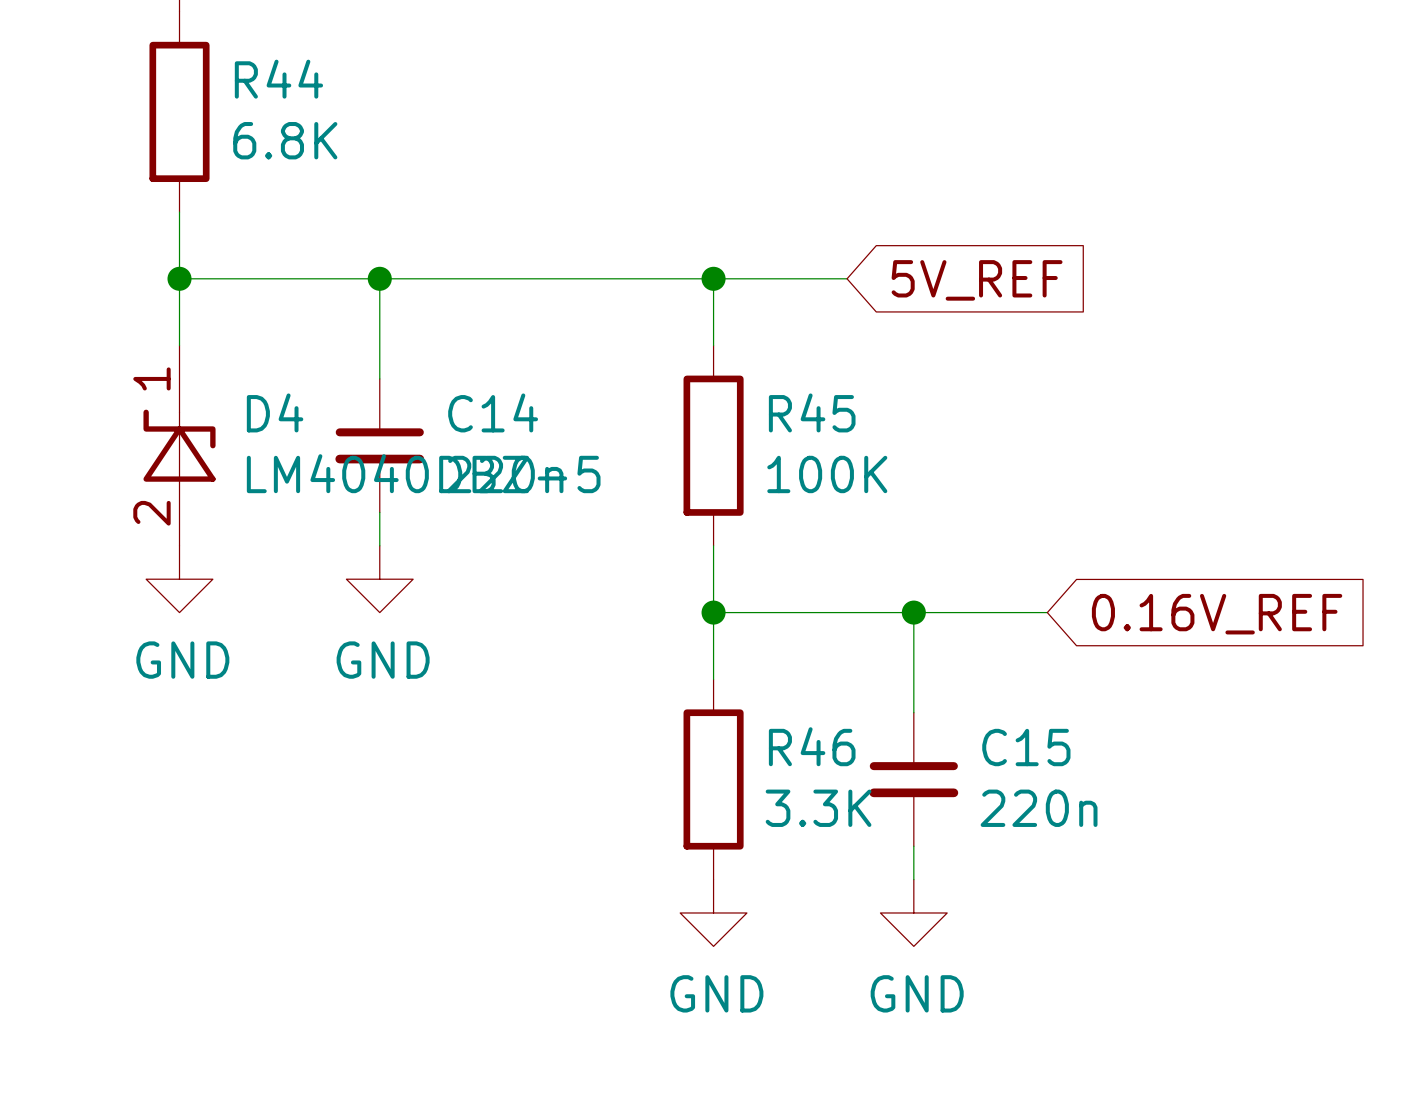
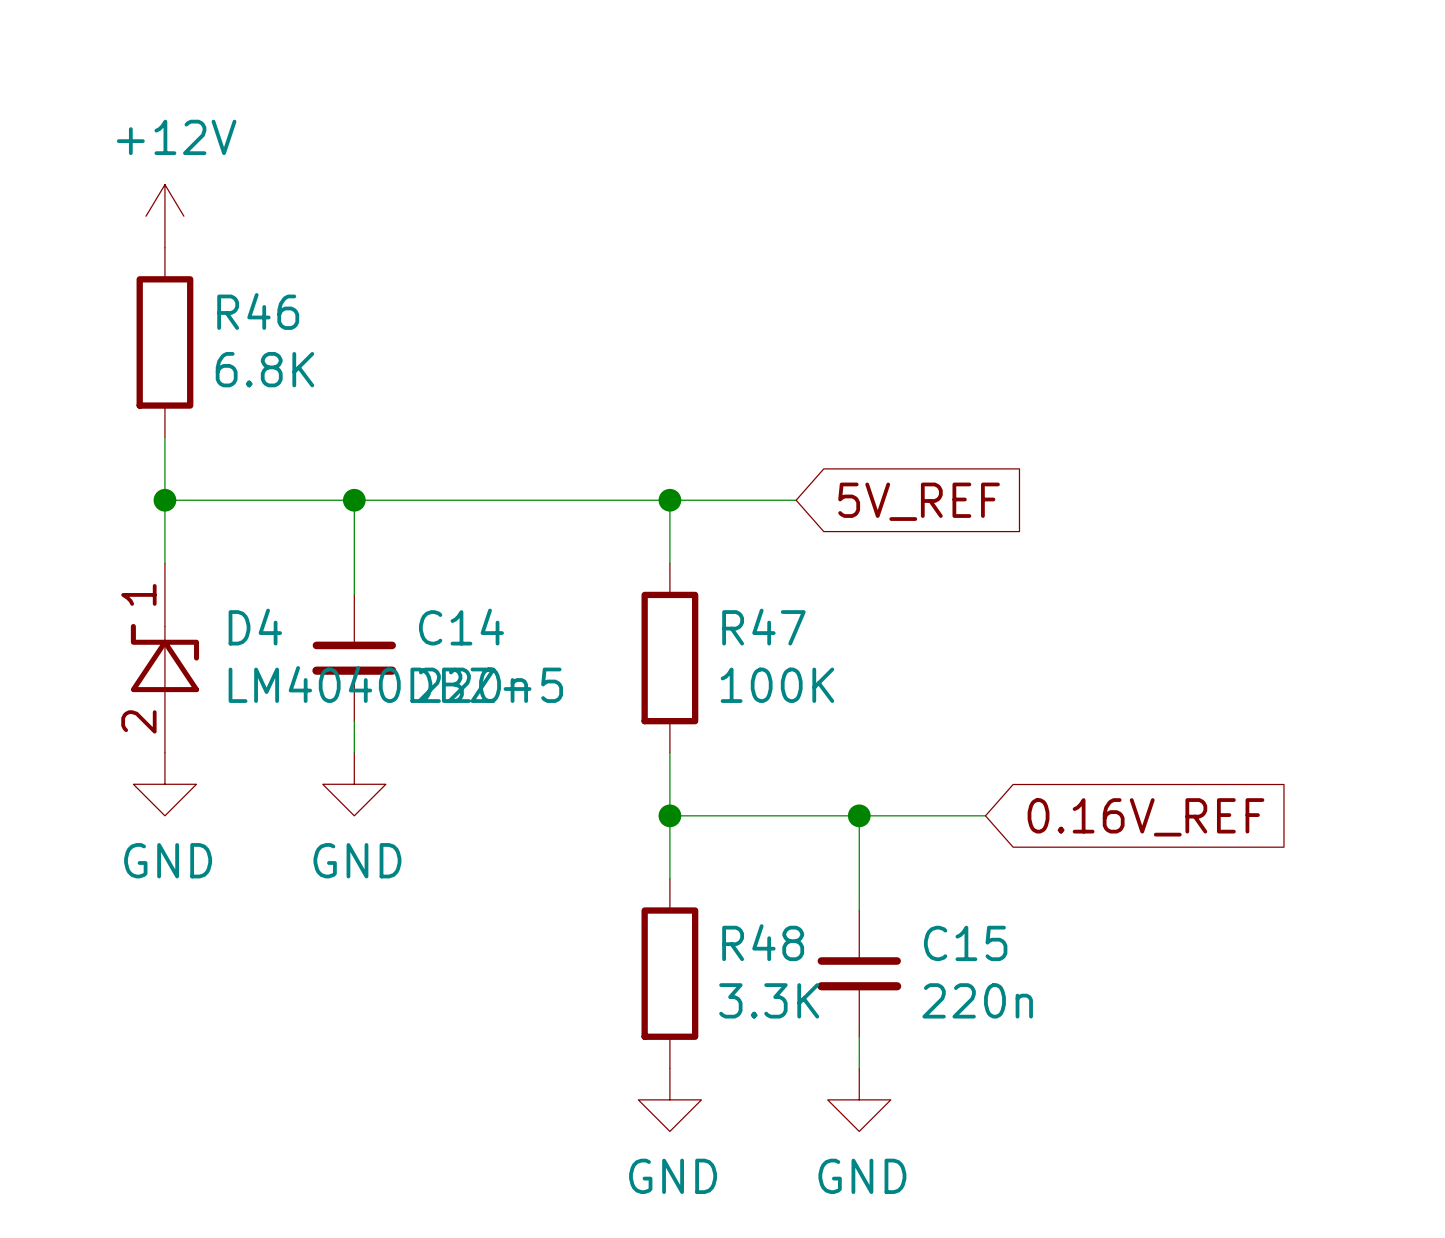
R44 name: R44 (278, 79) -> R46 (258, 311)
R45 name: R45 (812, 412) -> R47 (763, 627)
R46 name: R46 (812, 746) -> R48 (763, 942)

